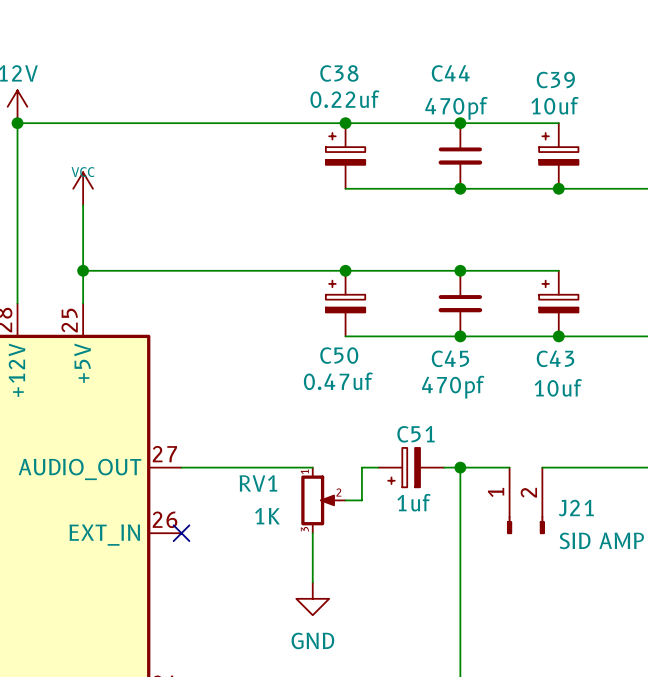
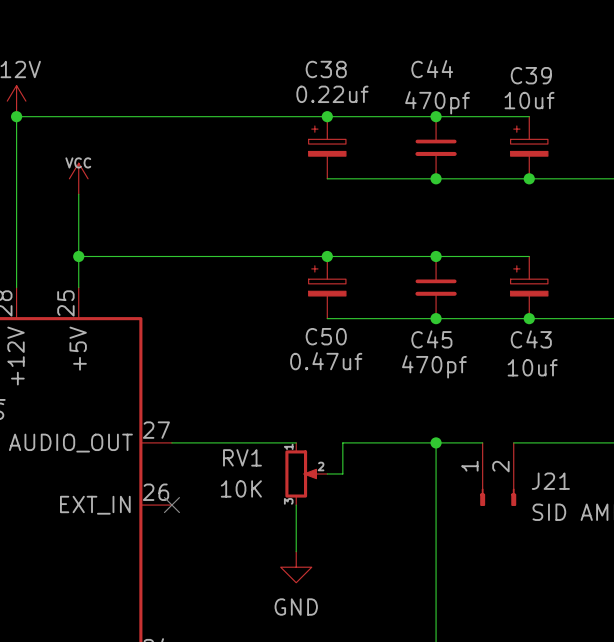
C51: 1uf (411, 467) -> none
RV1 value: 1K (267, 516) -> 10K (241, 488)

